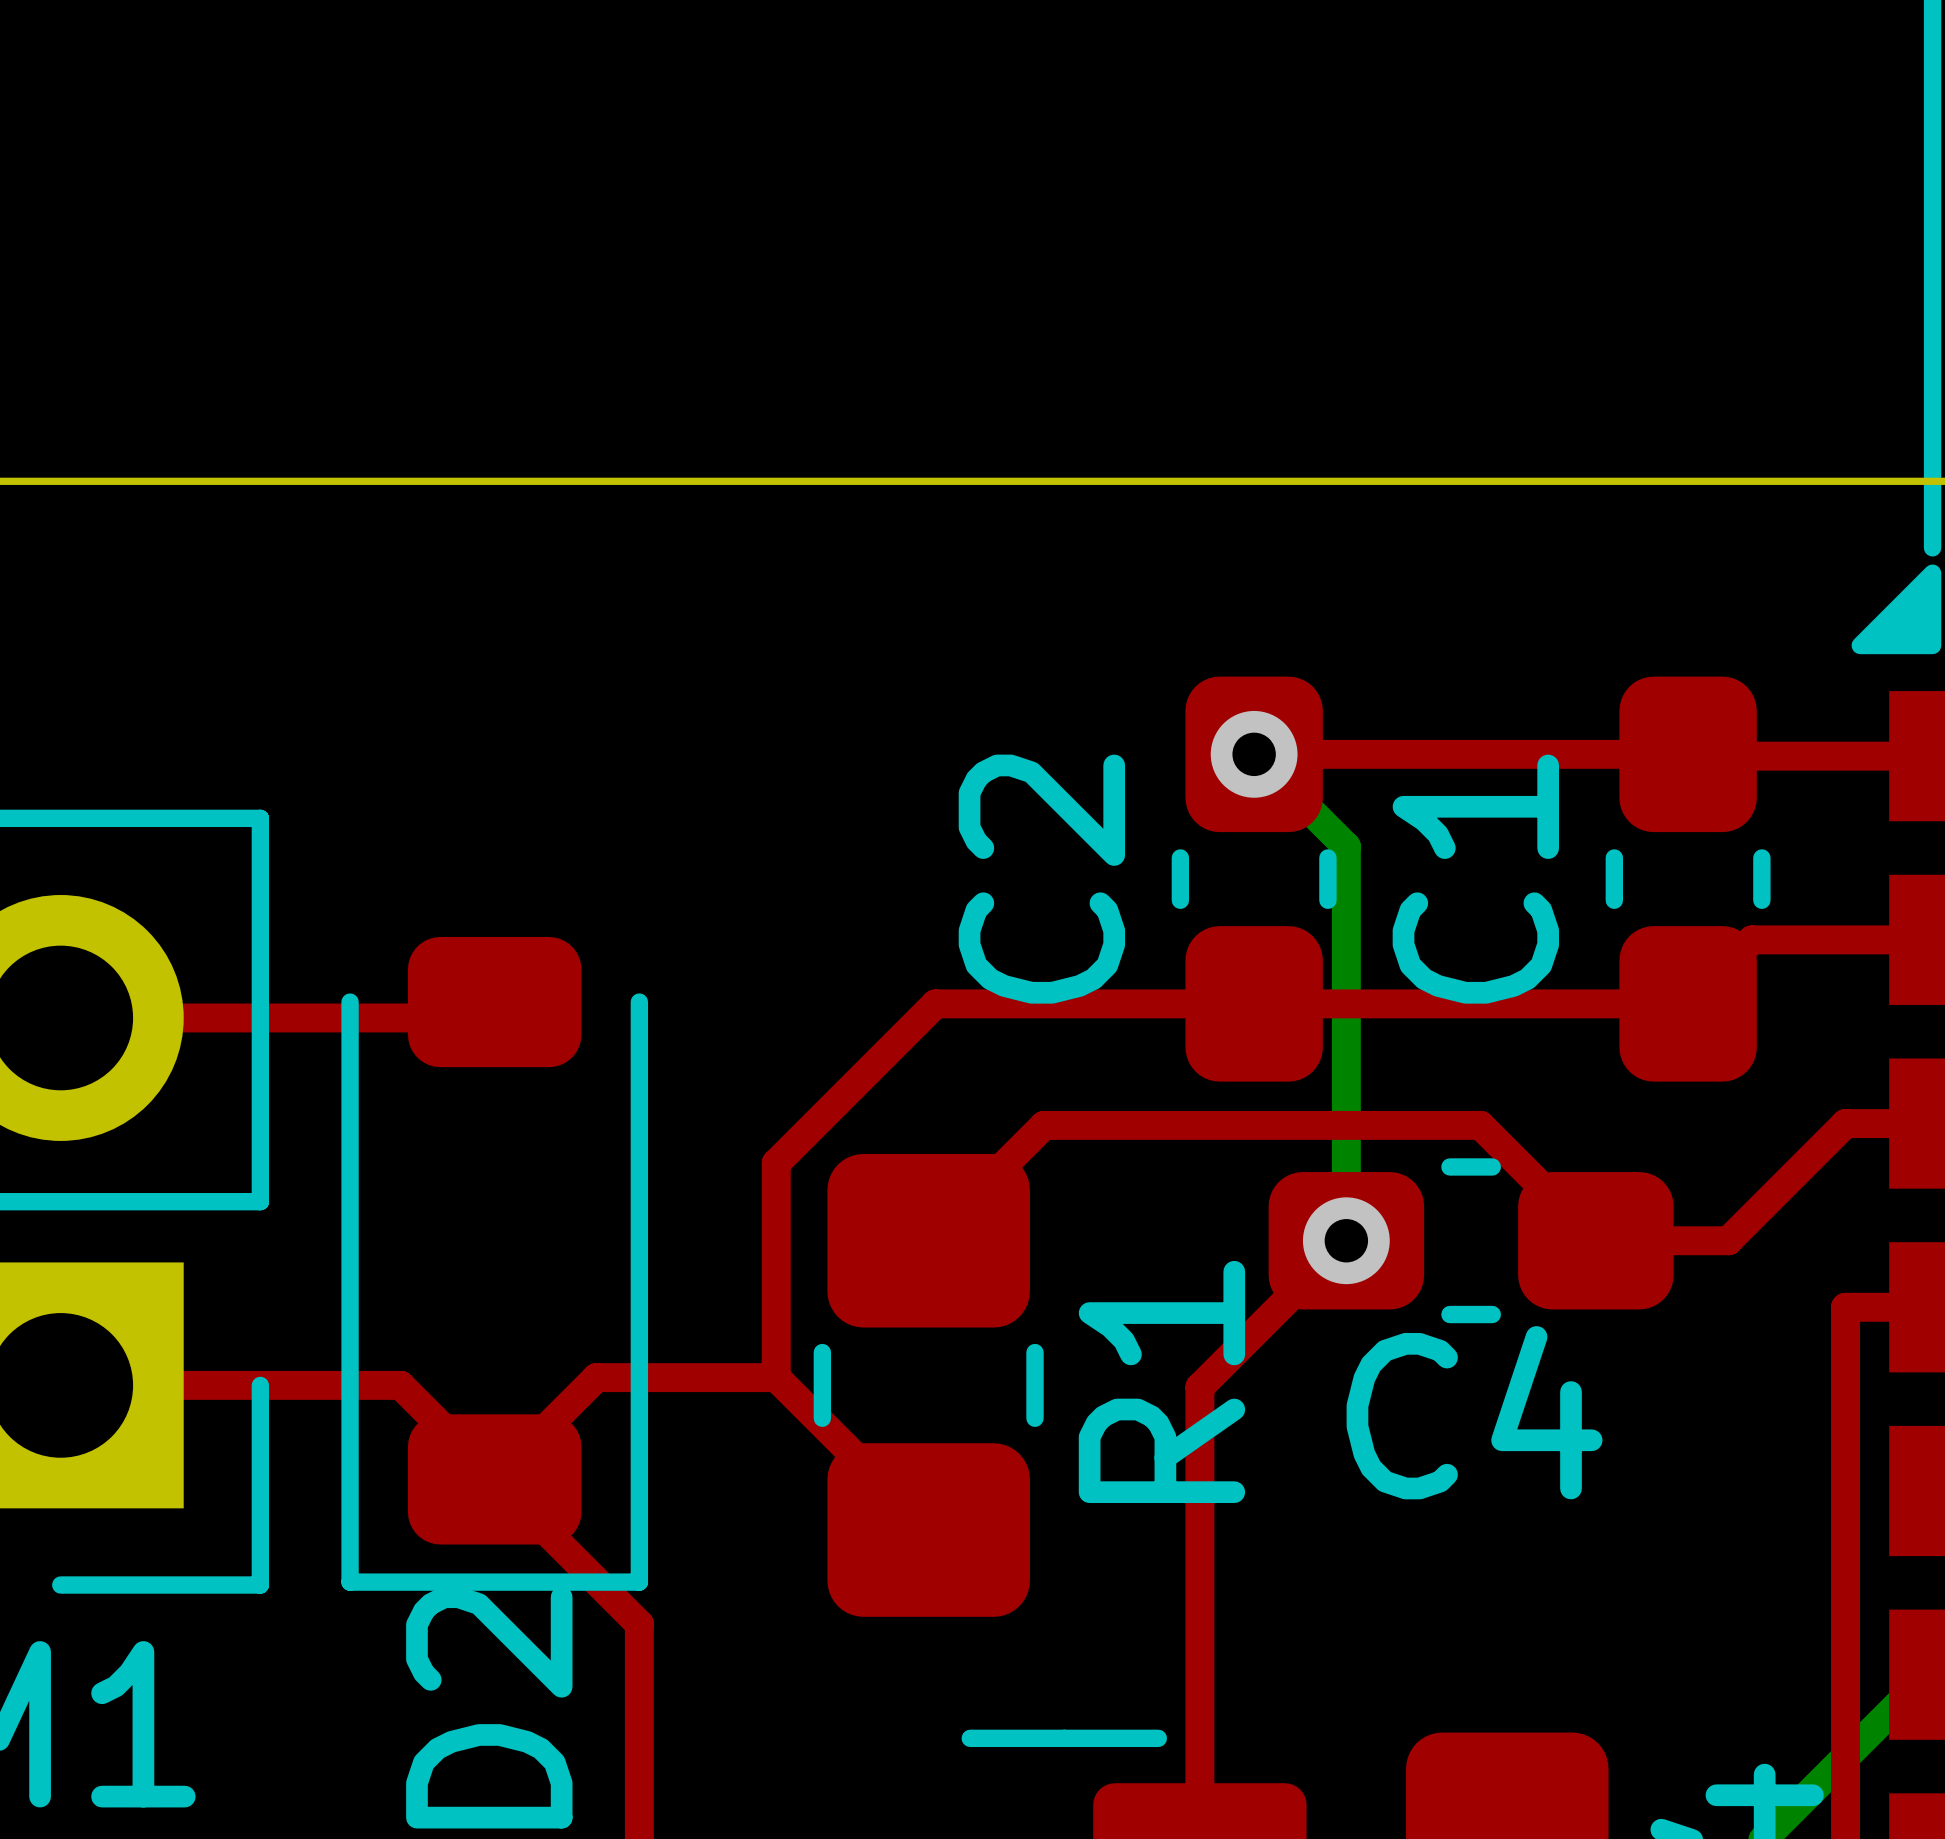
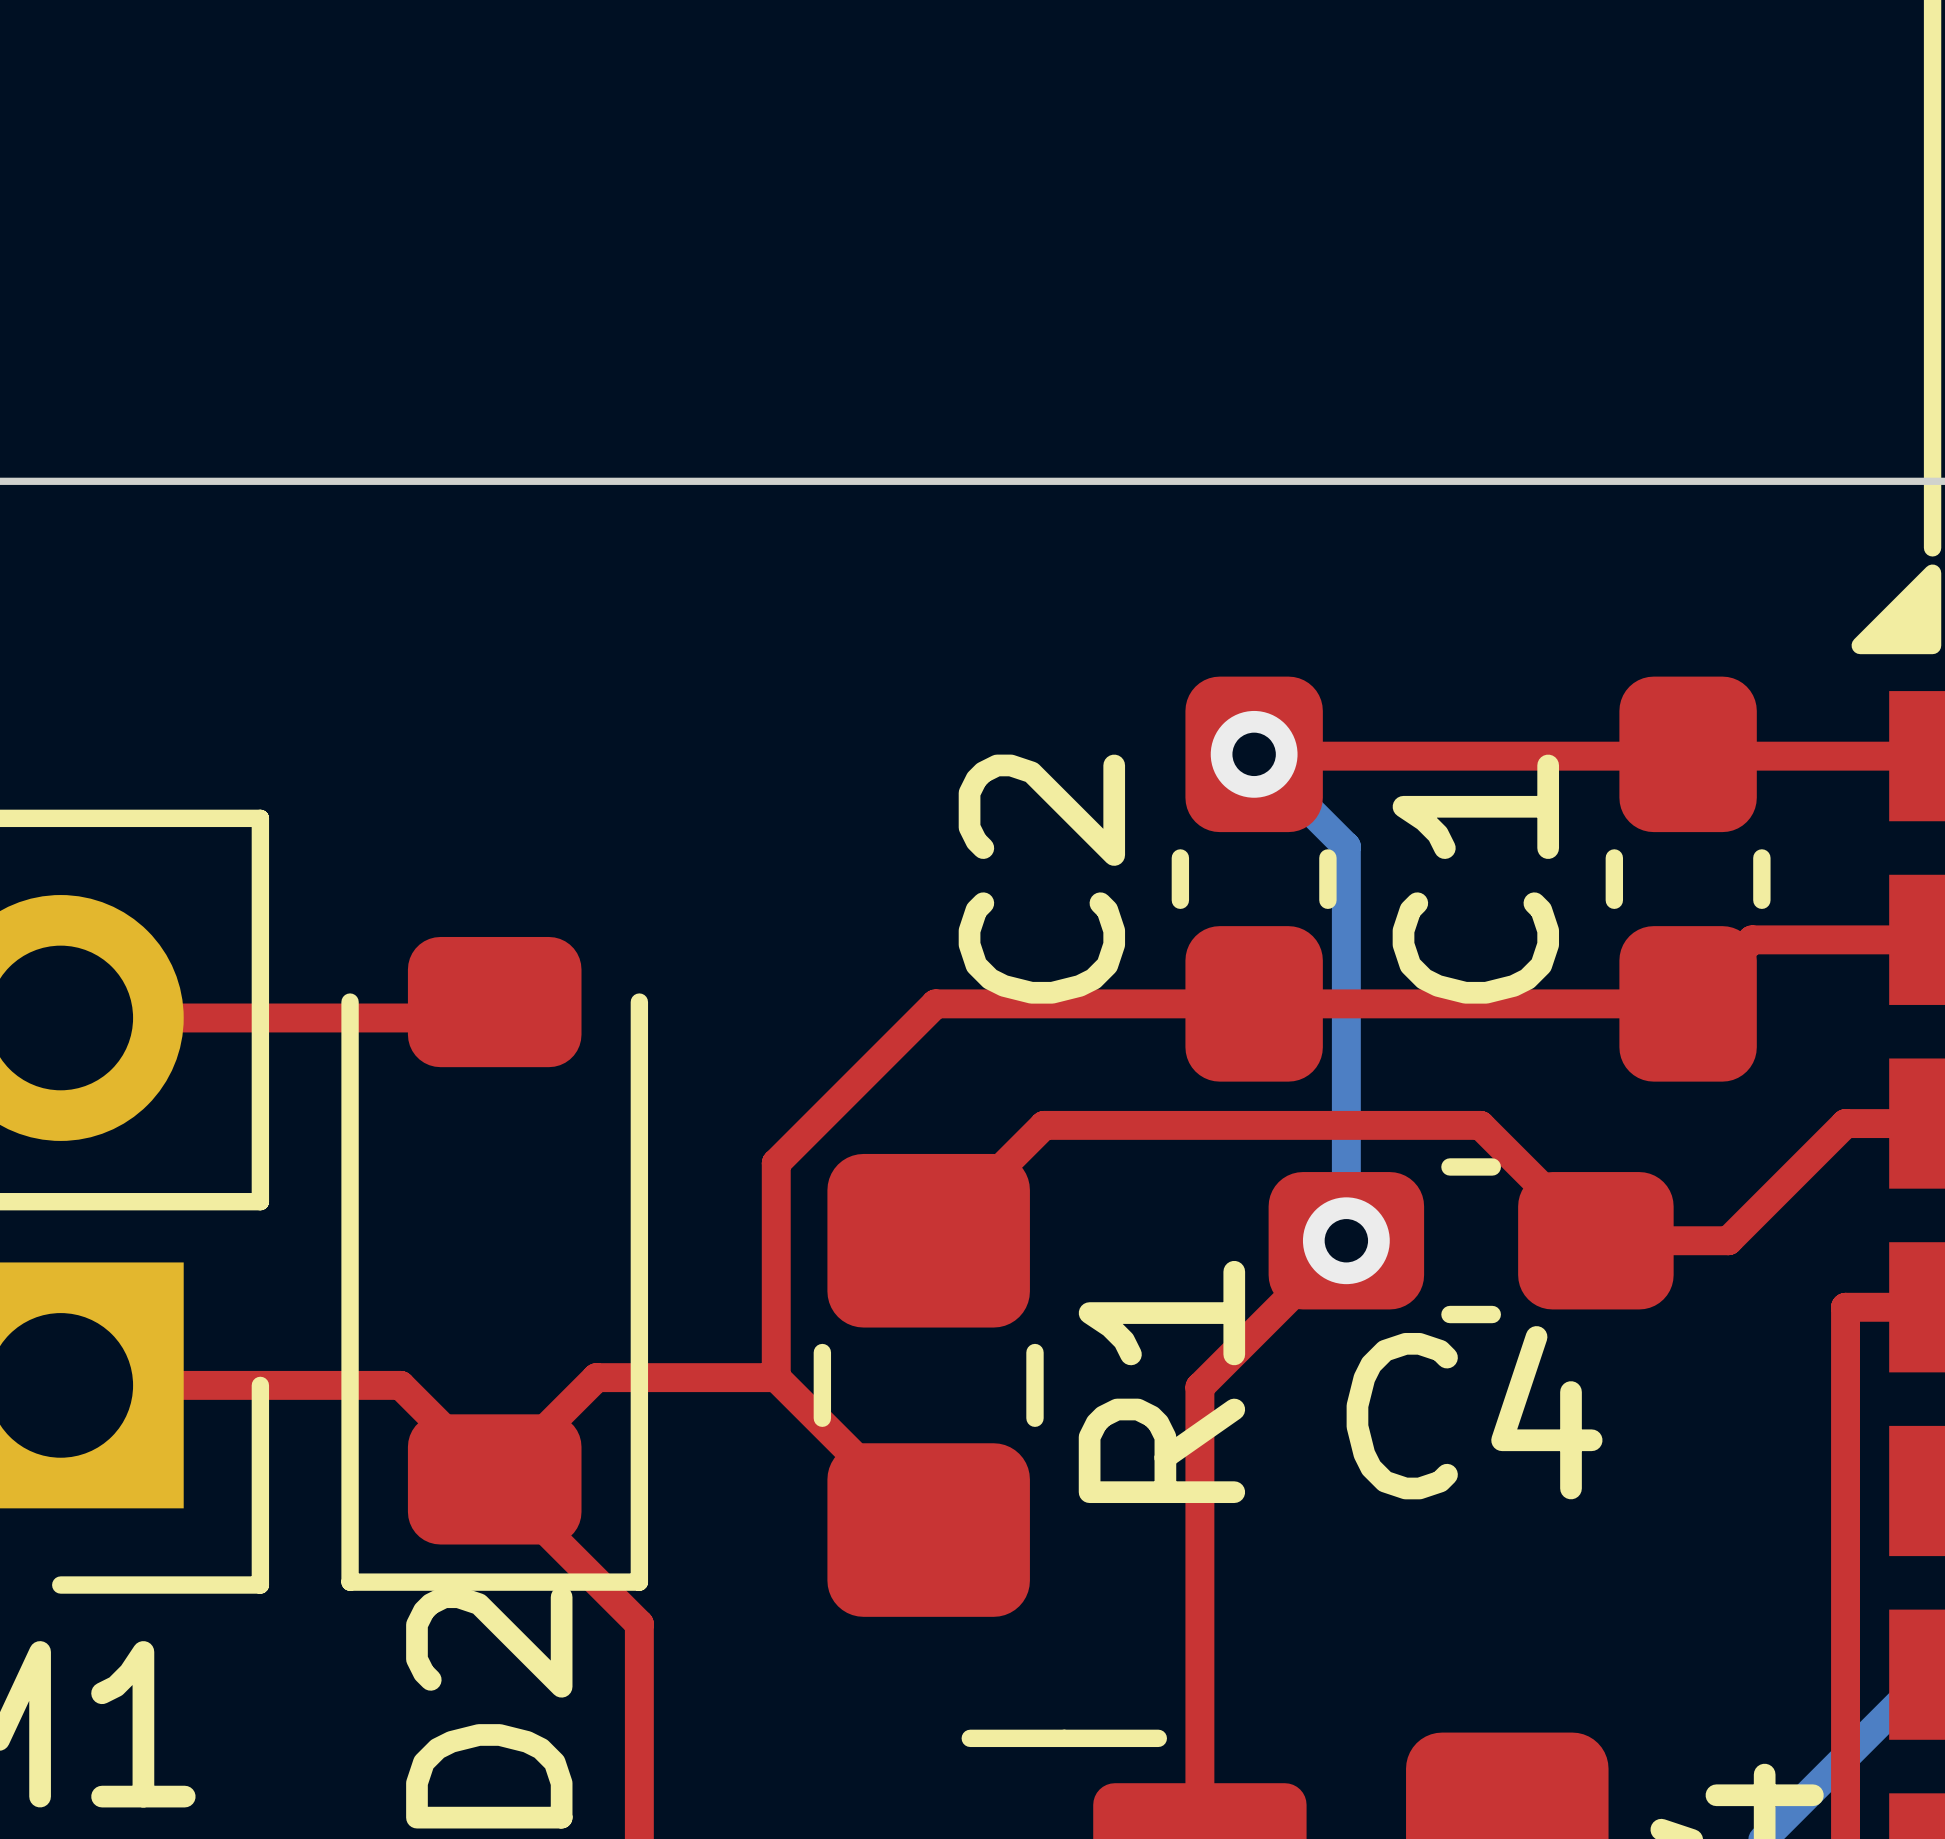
top track: (1254, 754) (1688, 754) -> (1239, 756) (1689, 756)

